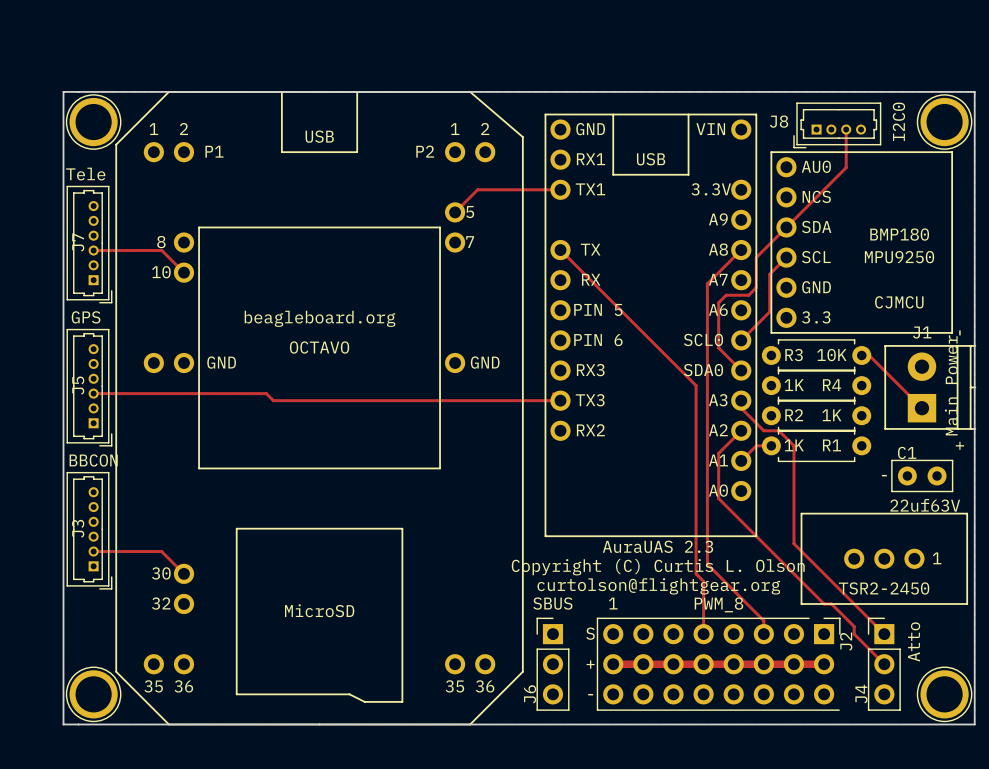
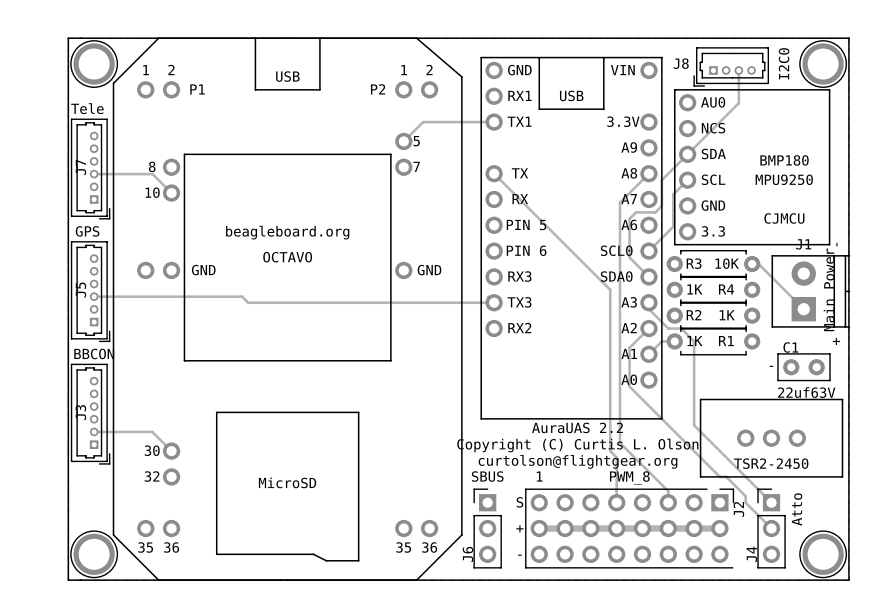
text: AuraUAS 2.3 (657, 546) -> AuraUAS 2.2 (577, 427)
text: 1 (937, 558) -> none

